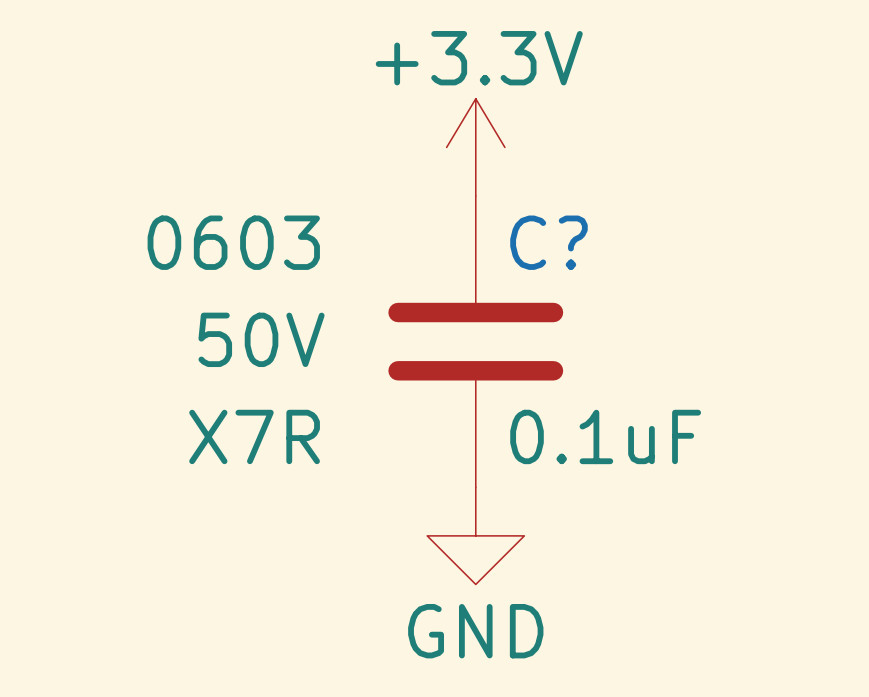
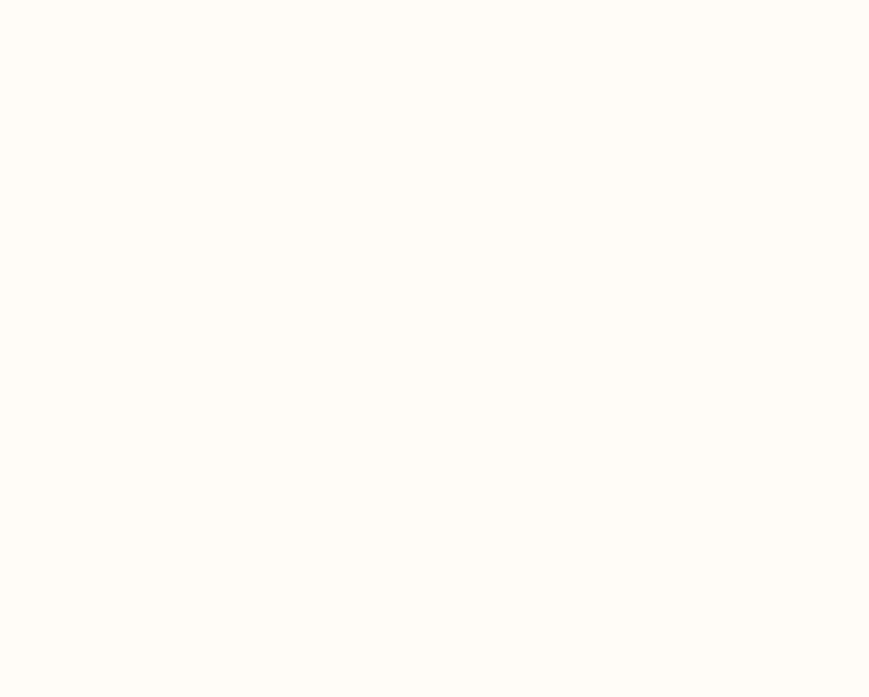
power symbol: +3.3V (475, 147) -> none
C?: 0.1uF (475, 341) -> none
power symbol: GND (475, 535) -> none

